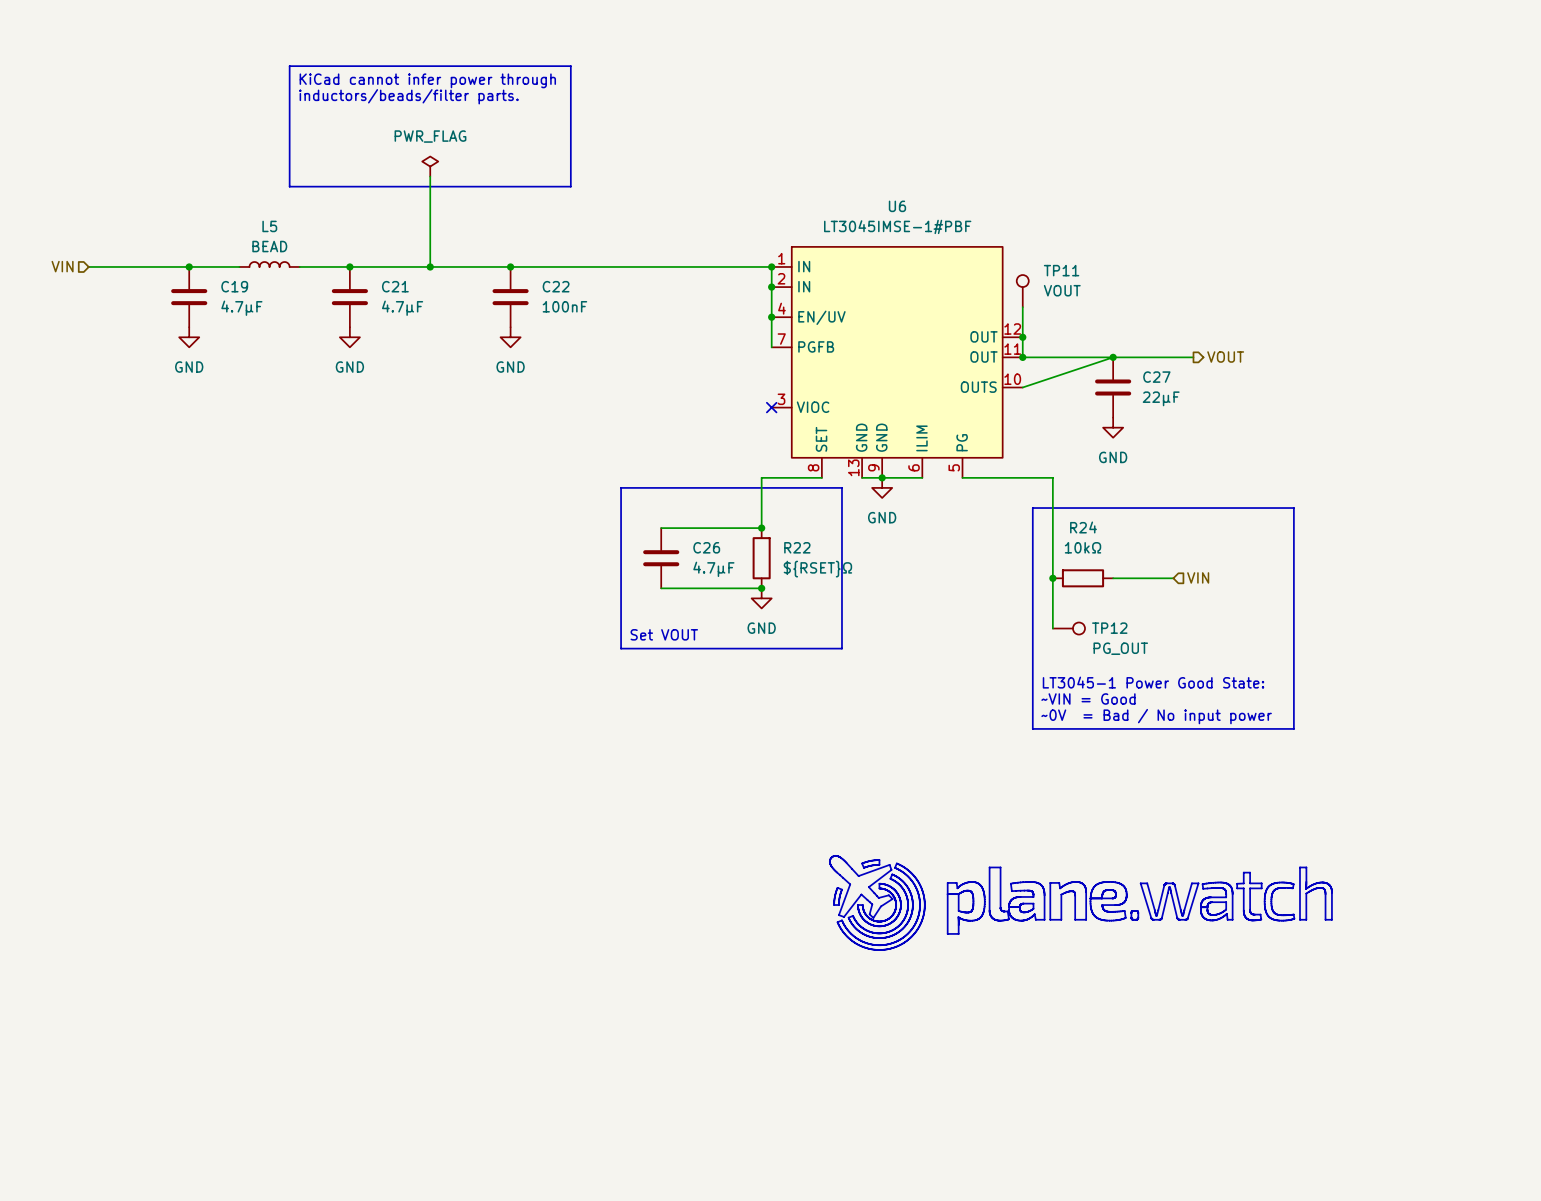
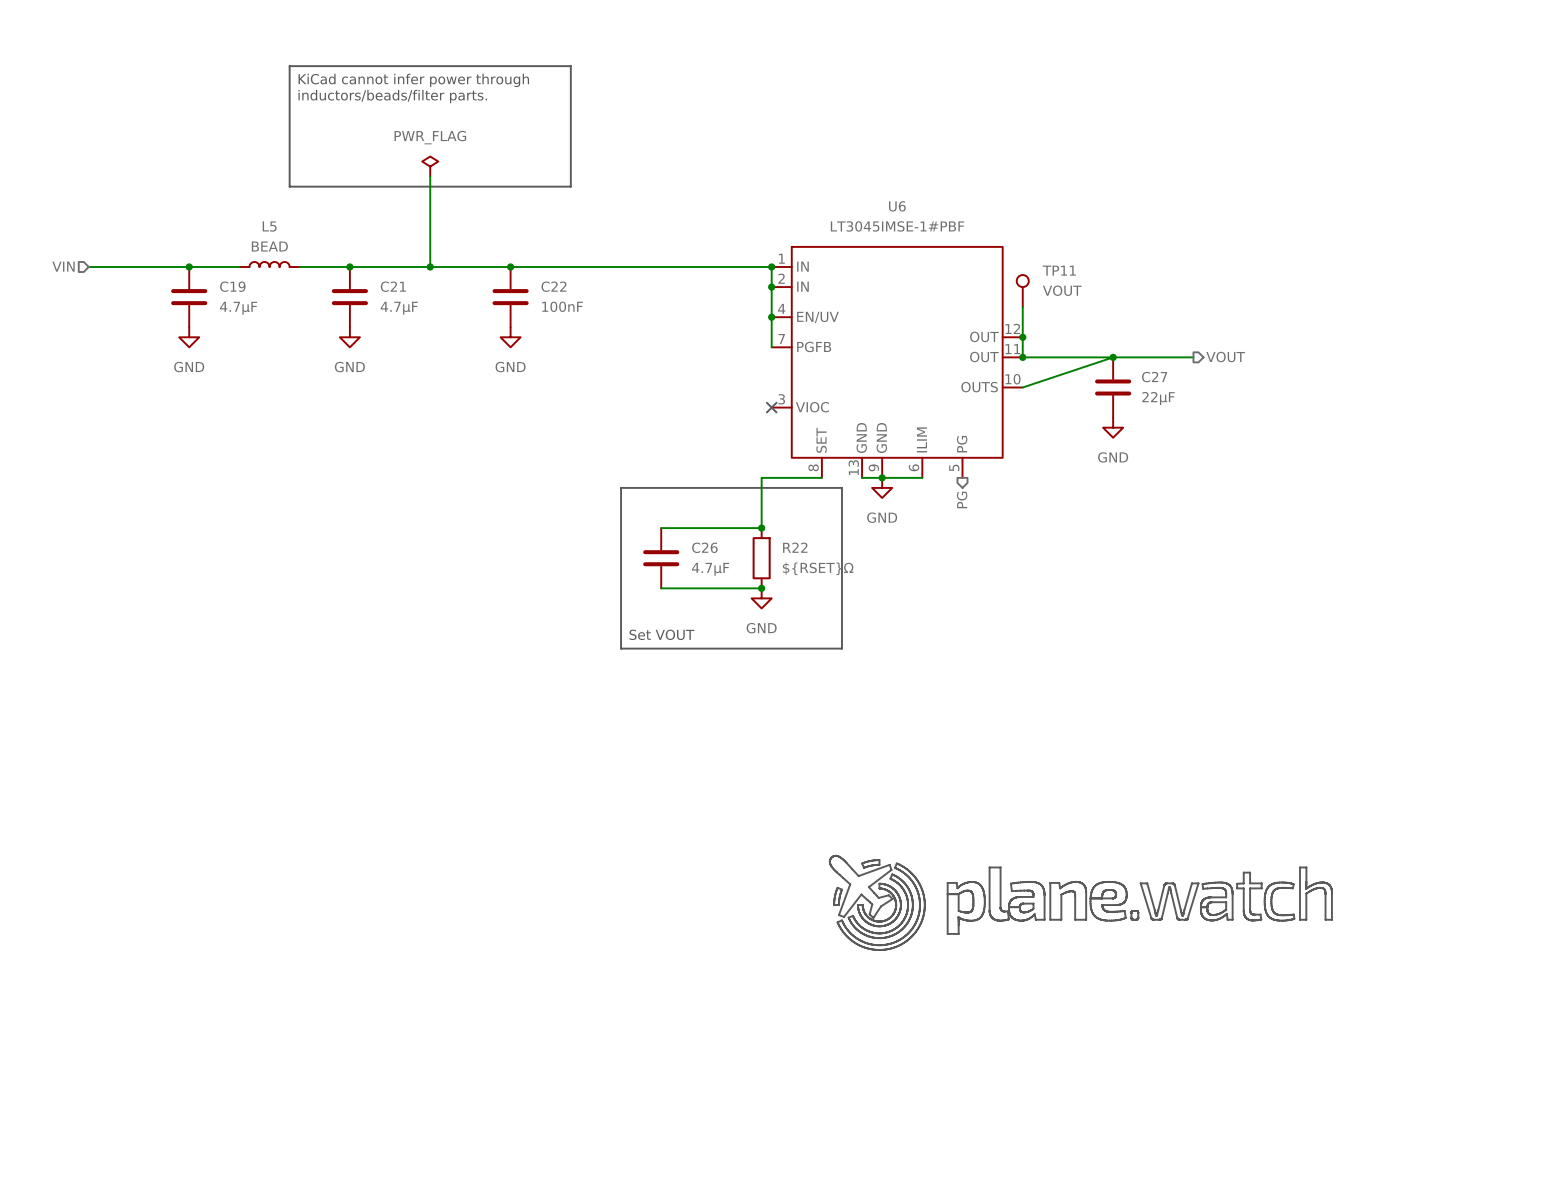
wire: (962, 477) (1052, 477) (1052, 628) -> none
hierarchical label: none -> PG (962, 500)
line: (1032, 508) (1293, 508) (1293, 728) (1032, 728) (1032, 508) -> none
hierarchical label: VIN (1198, 577) -> none
junction: (1052, 578) -> none
R24: 10kΩ (1083, 578) -> none
wire: (1113, 578) (1173, 578) -> none
TP12: PG_OUT (1068, 628) -> none
text: LT3045-1 Power Good State: (1153, 682) -> none
text: ~VIN = Good (1088, 699) -> none
text: ~0V = Bad / No input power (1156, 716) -> none

